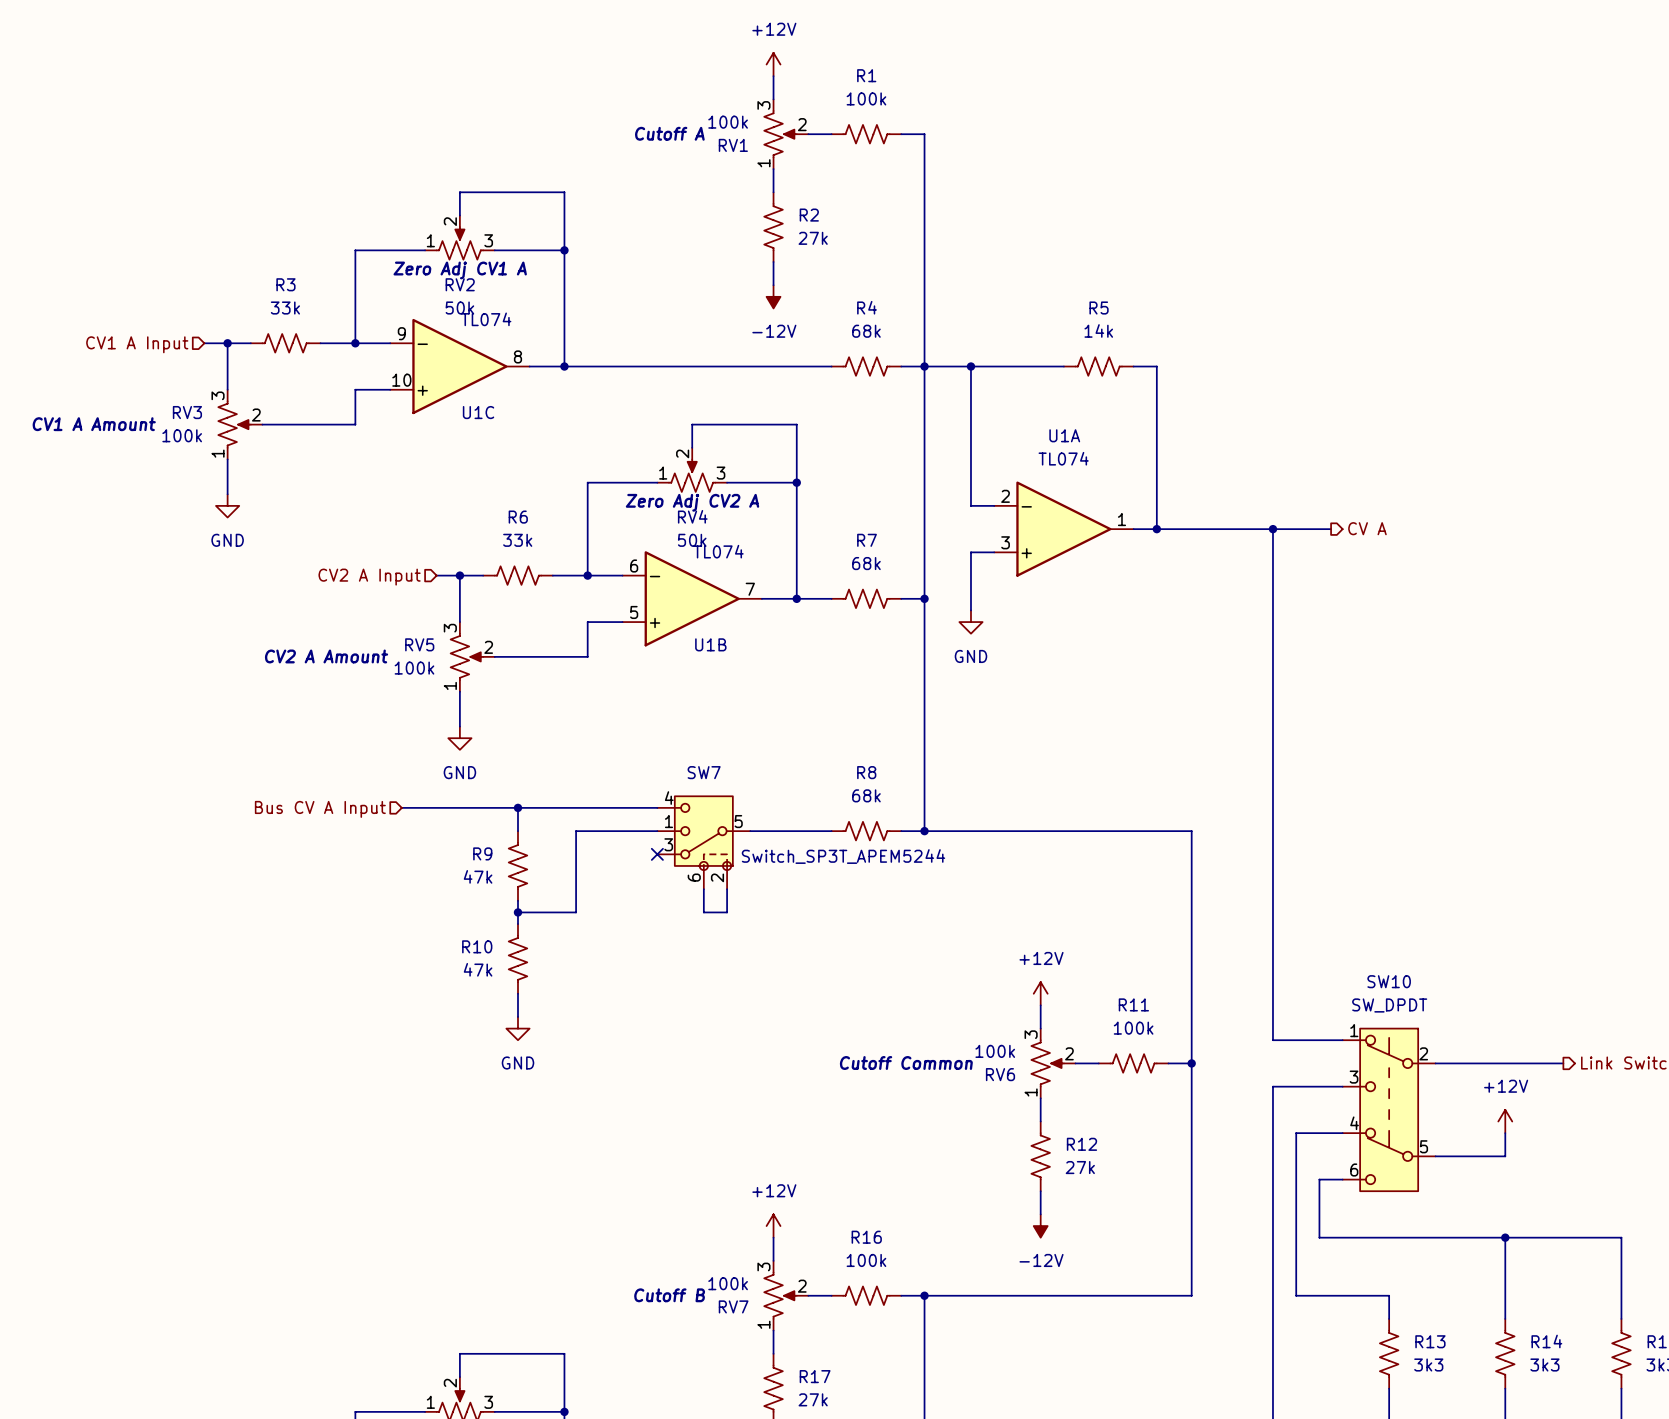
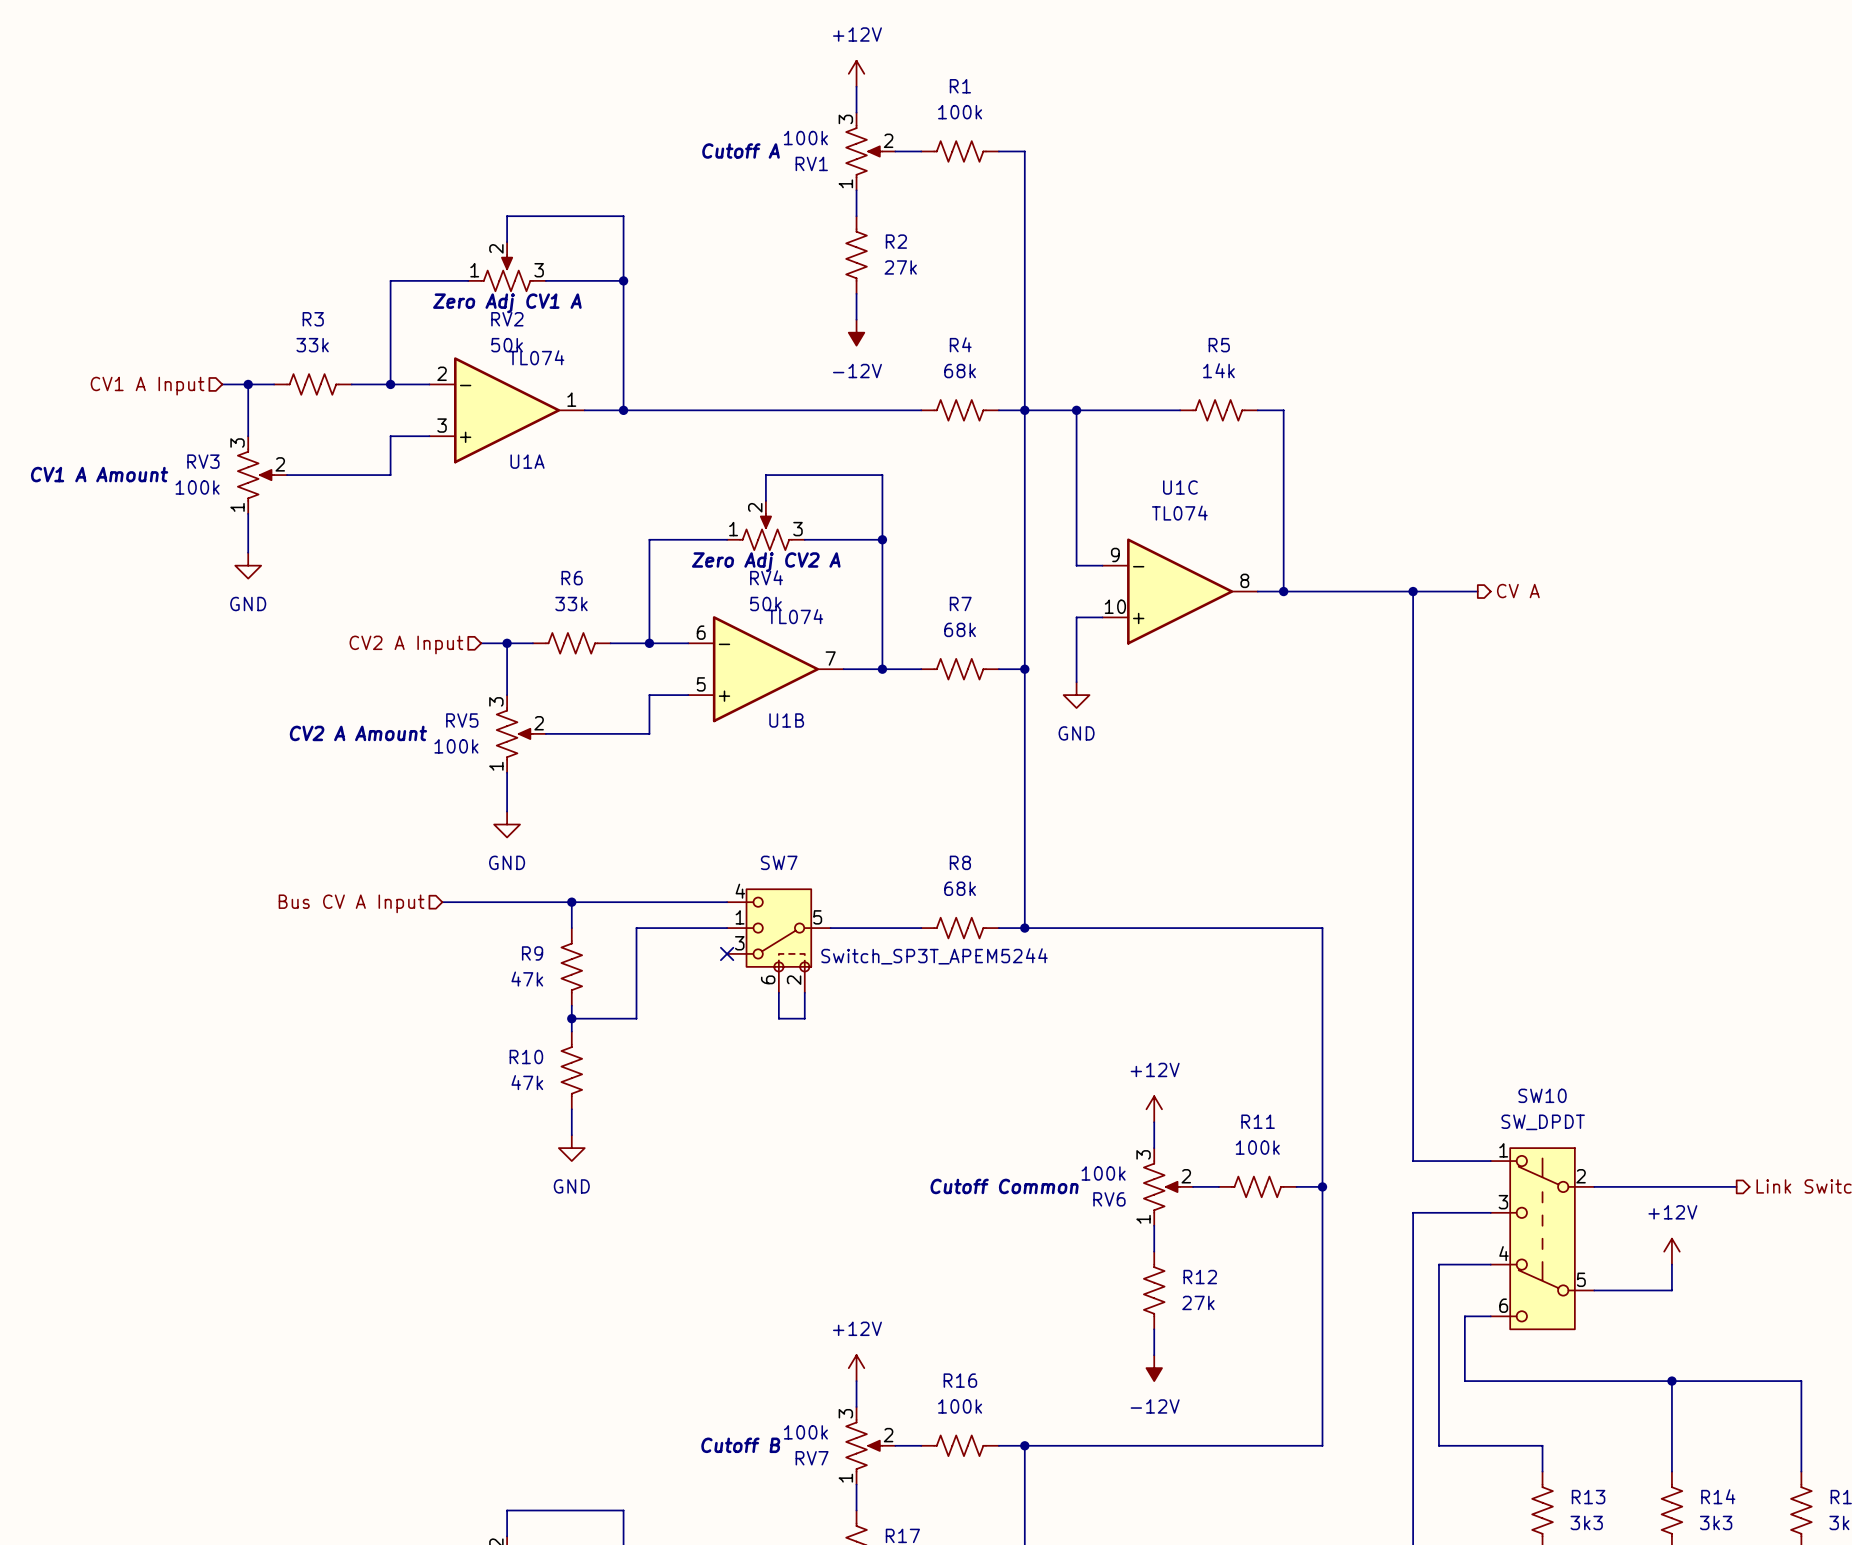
U1C position: (459, 366) -> (1180, 591)
U1C name position: U1C (478, 412) -> U1C (1180, 487)
U1A name position: U1A (1064, 435) -> U1A (527, 461)
U1A position: (1063, 529) -> (507, 410)

